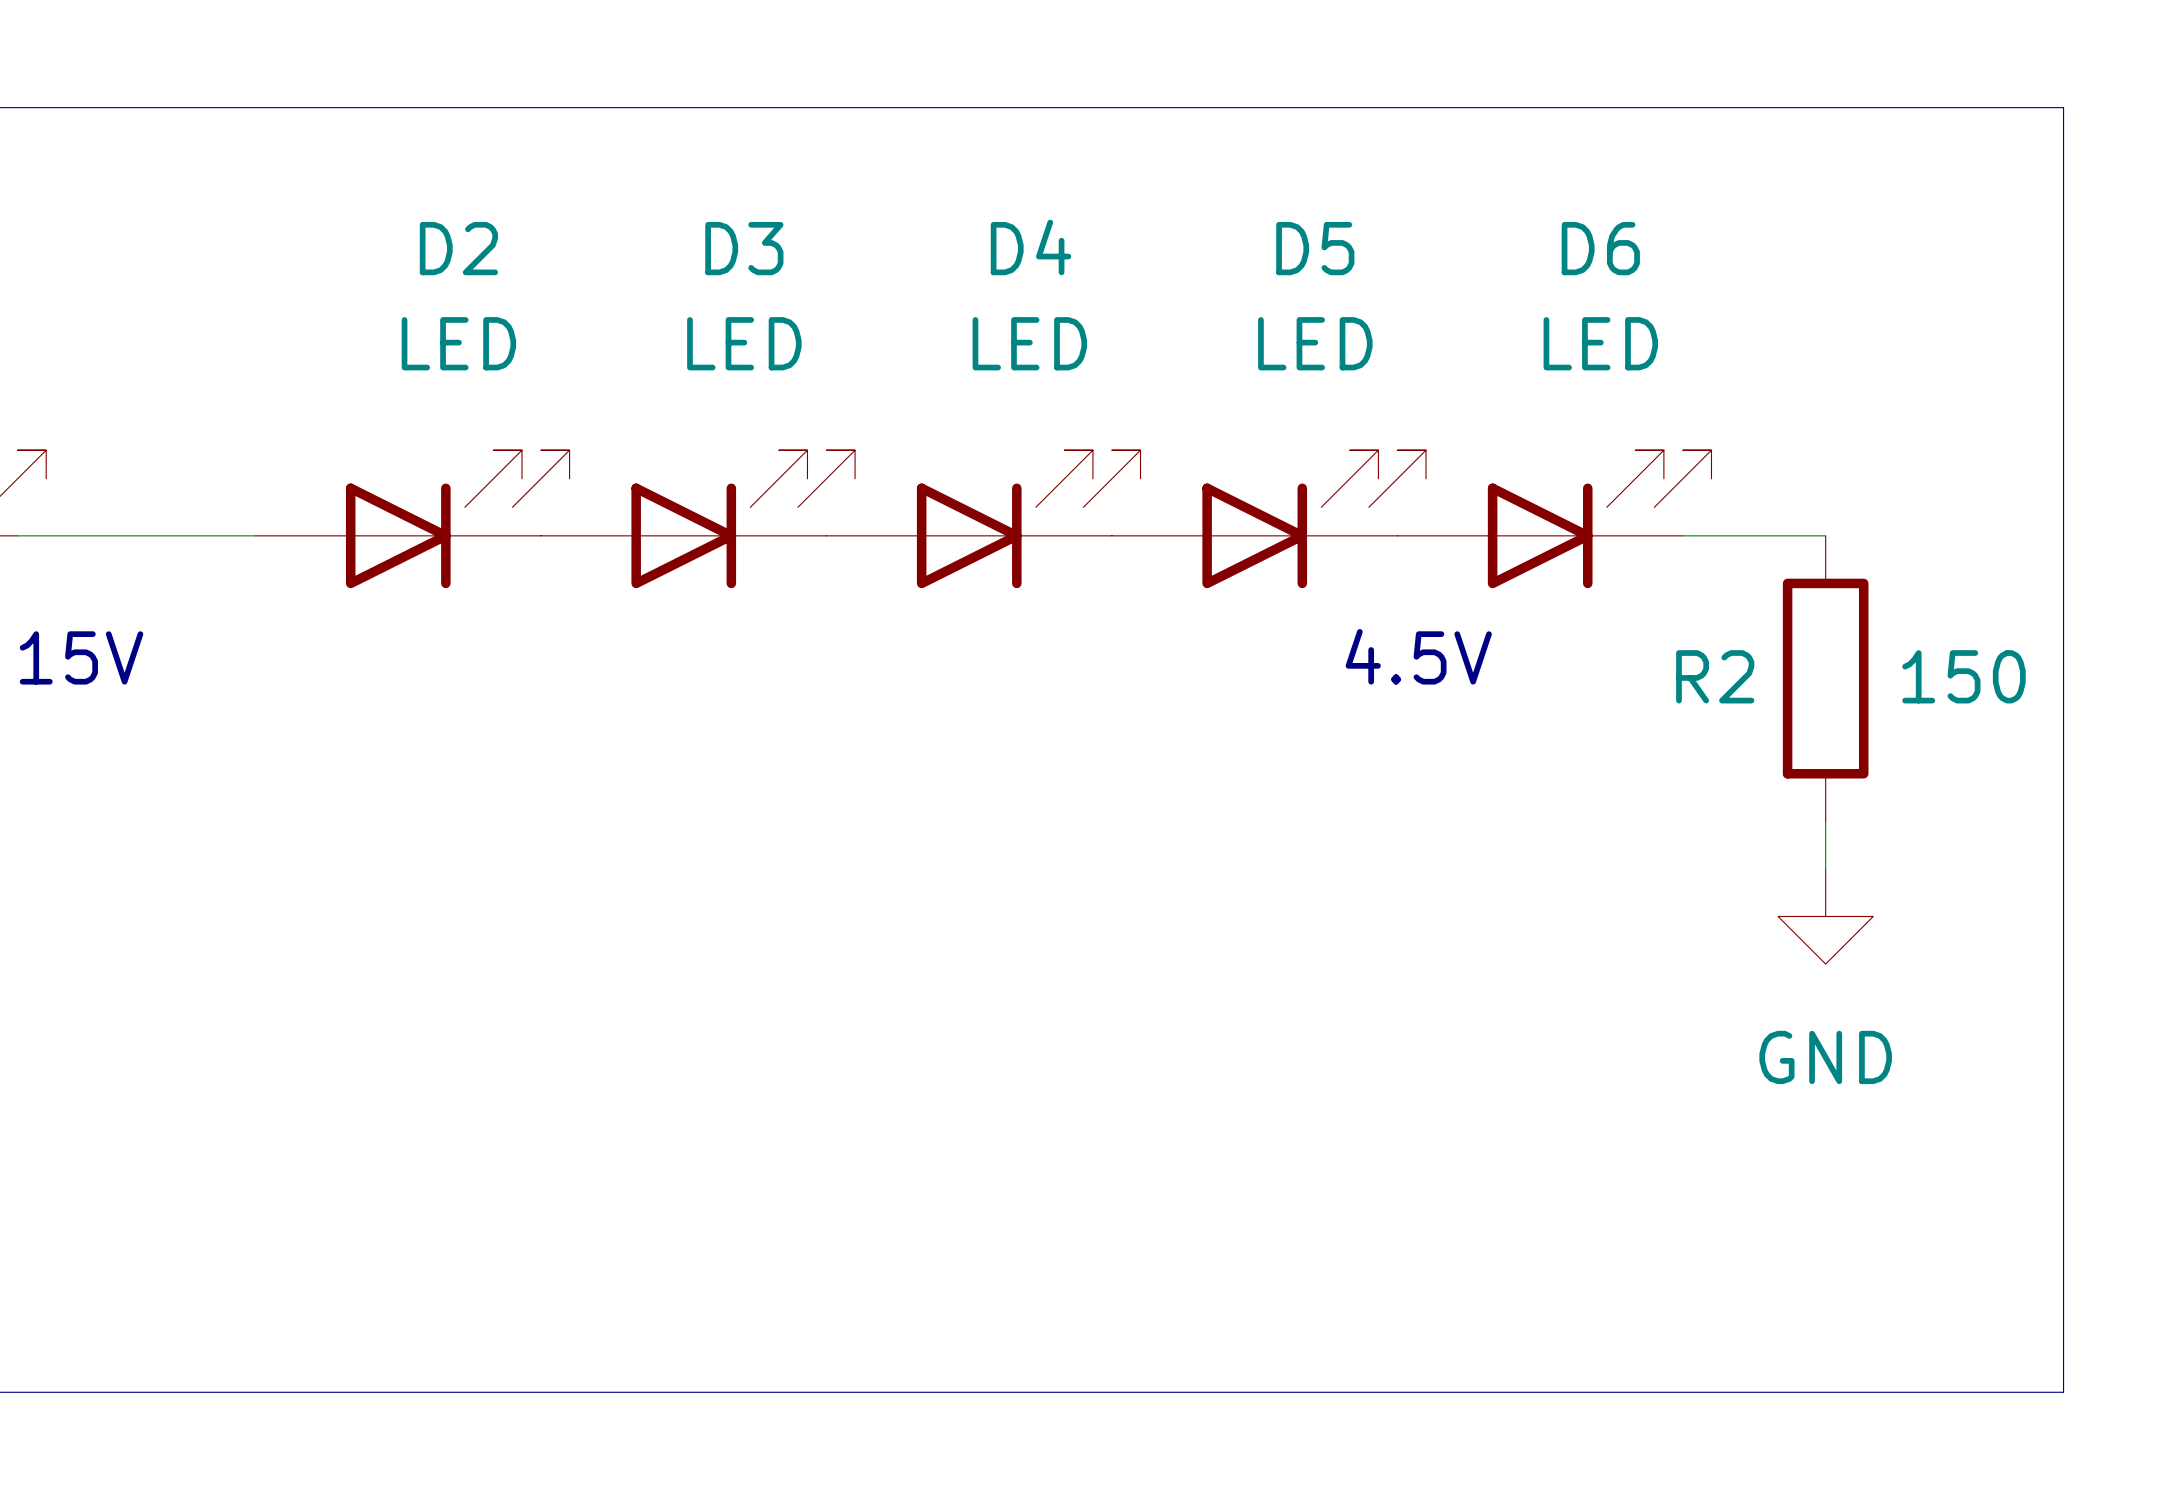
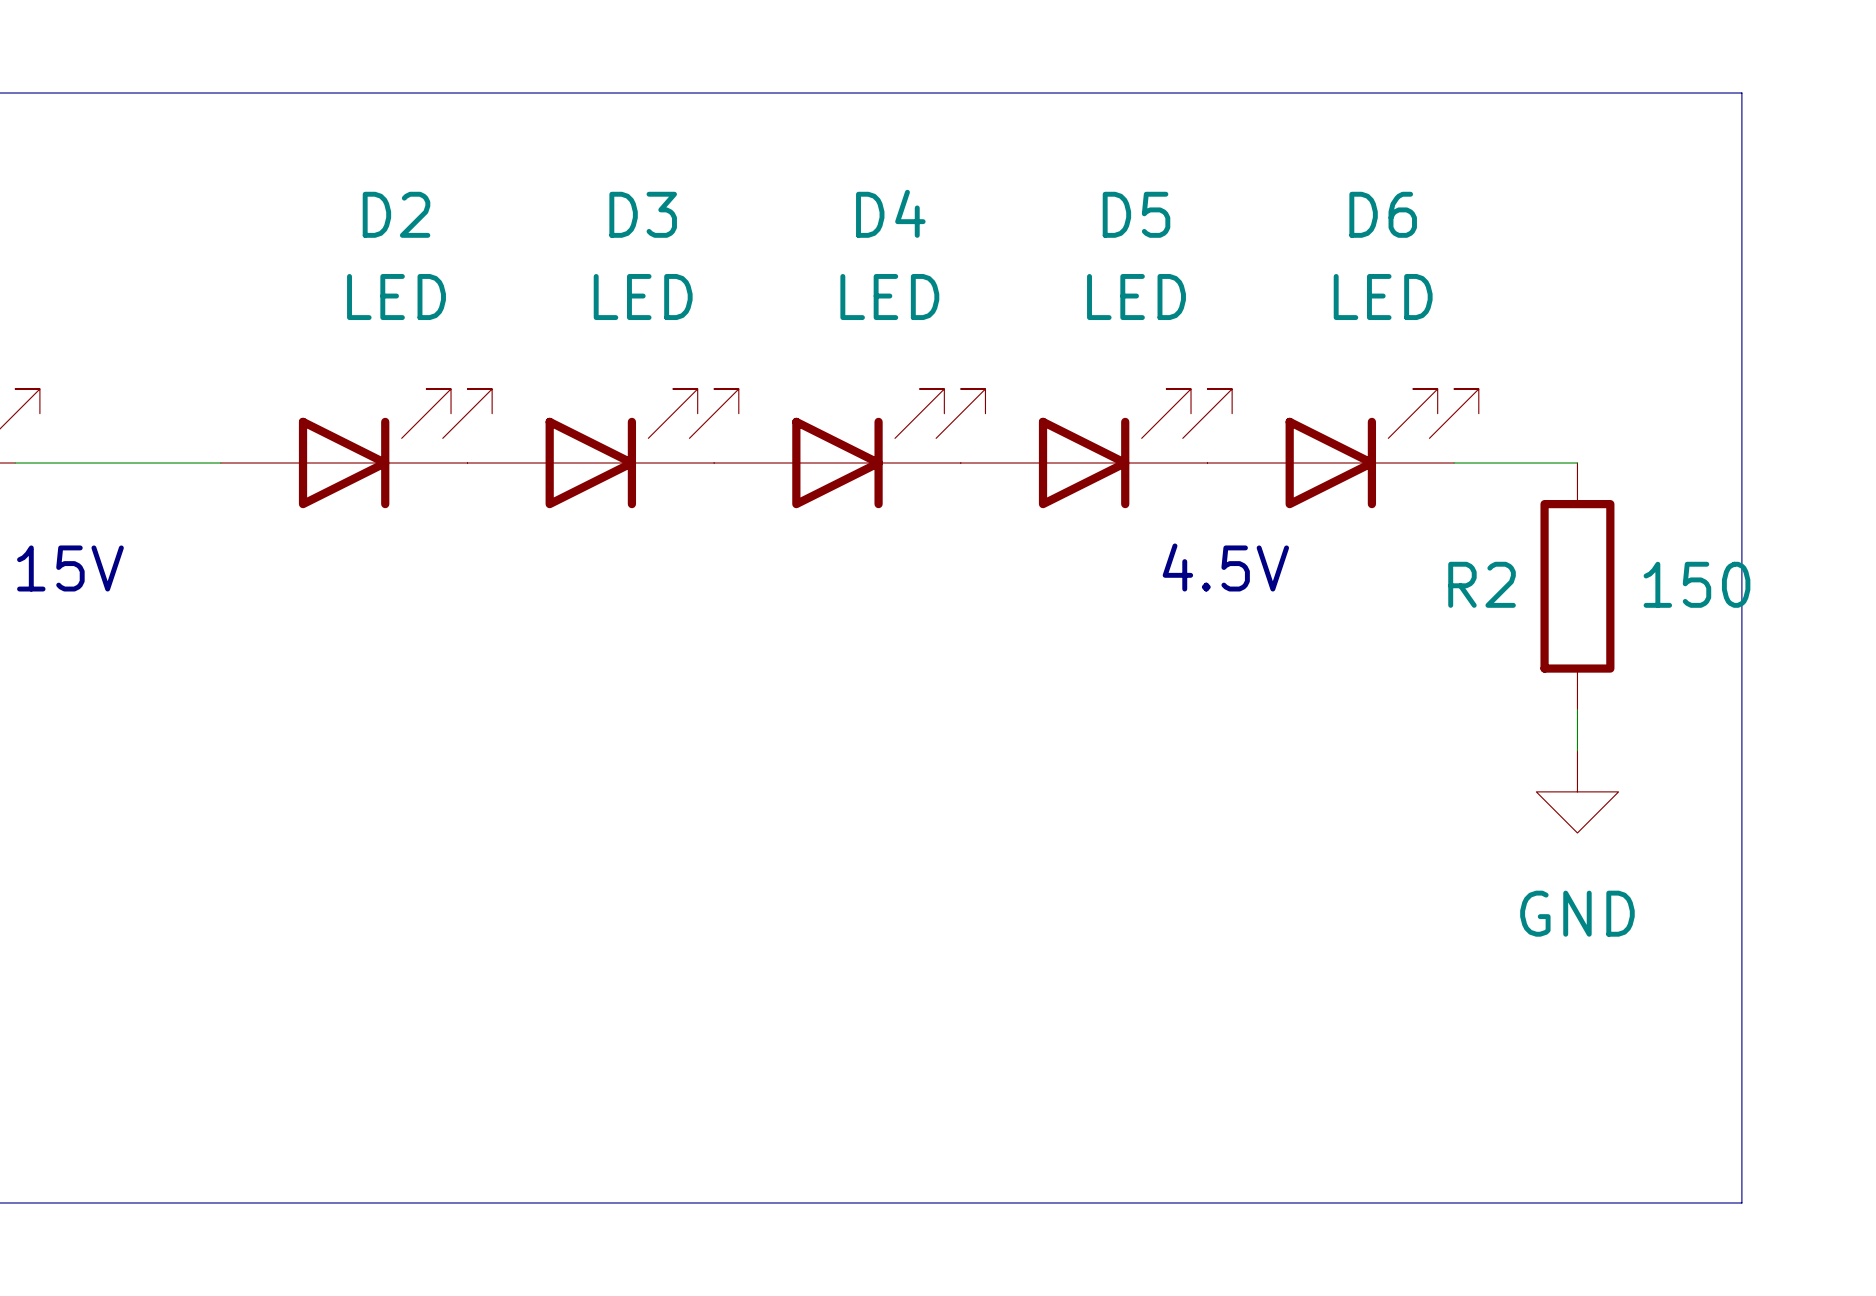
line: (2015, 107) (2063, 107) (2063, 1392) (2015, 1392) -> (1741, 93) (1741, 1202)

